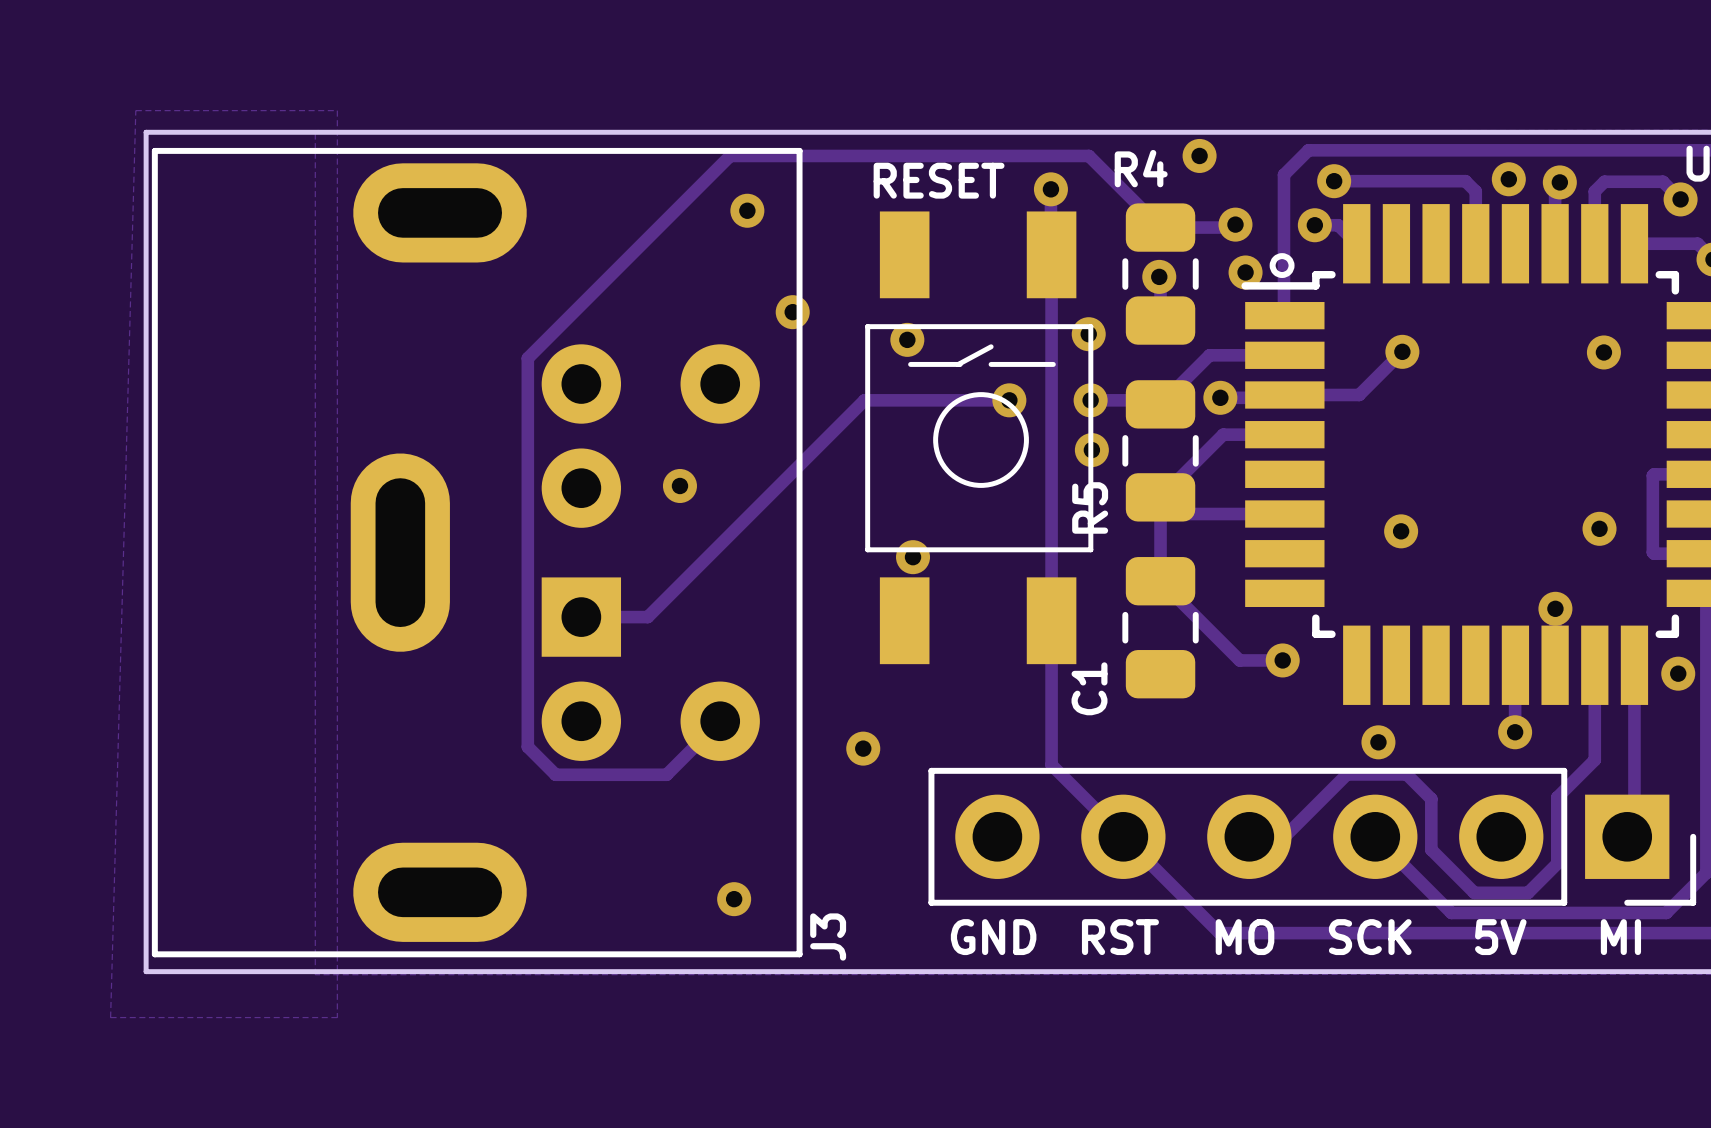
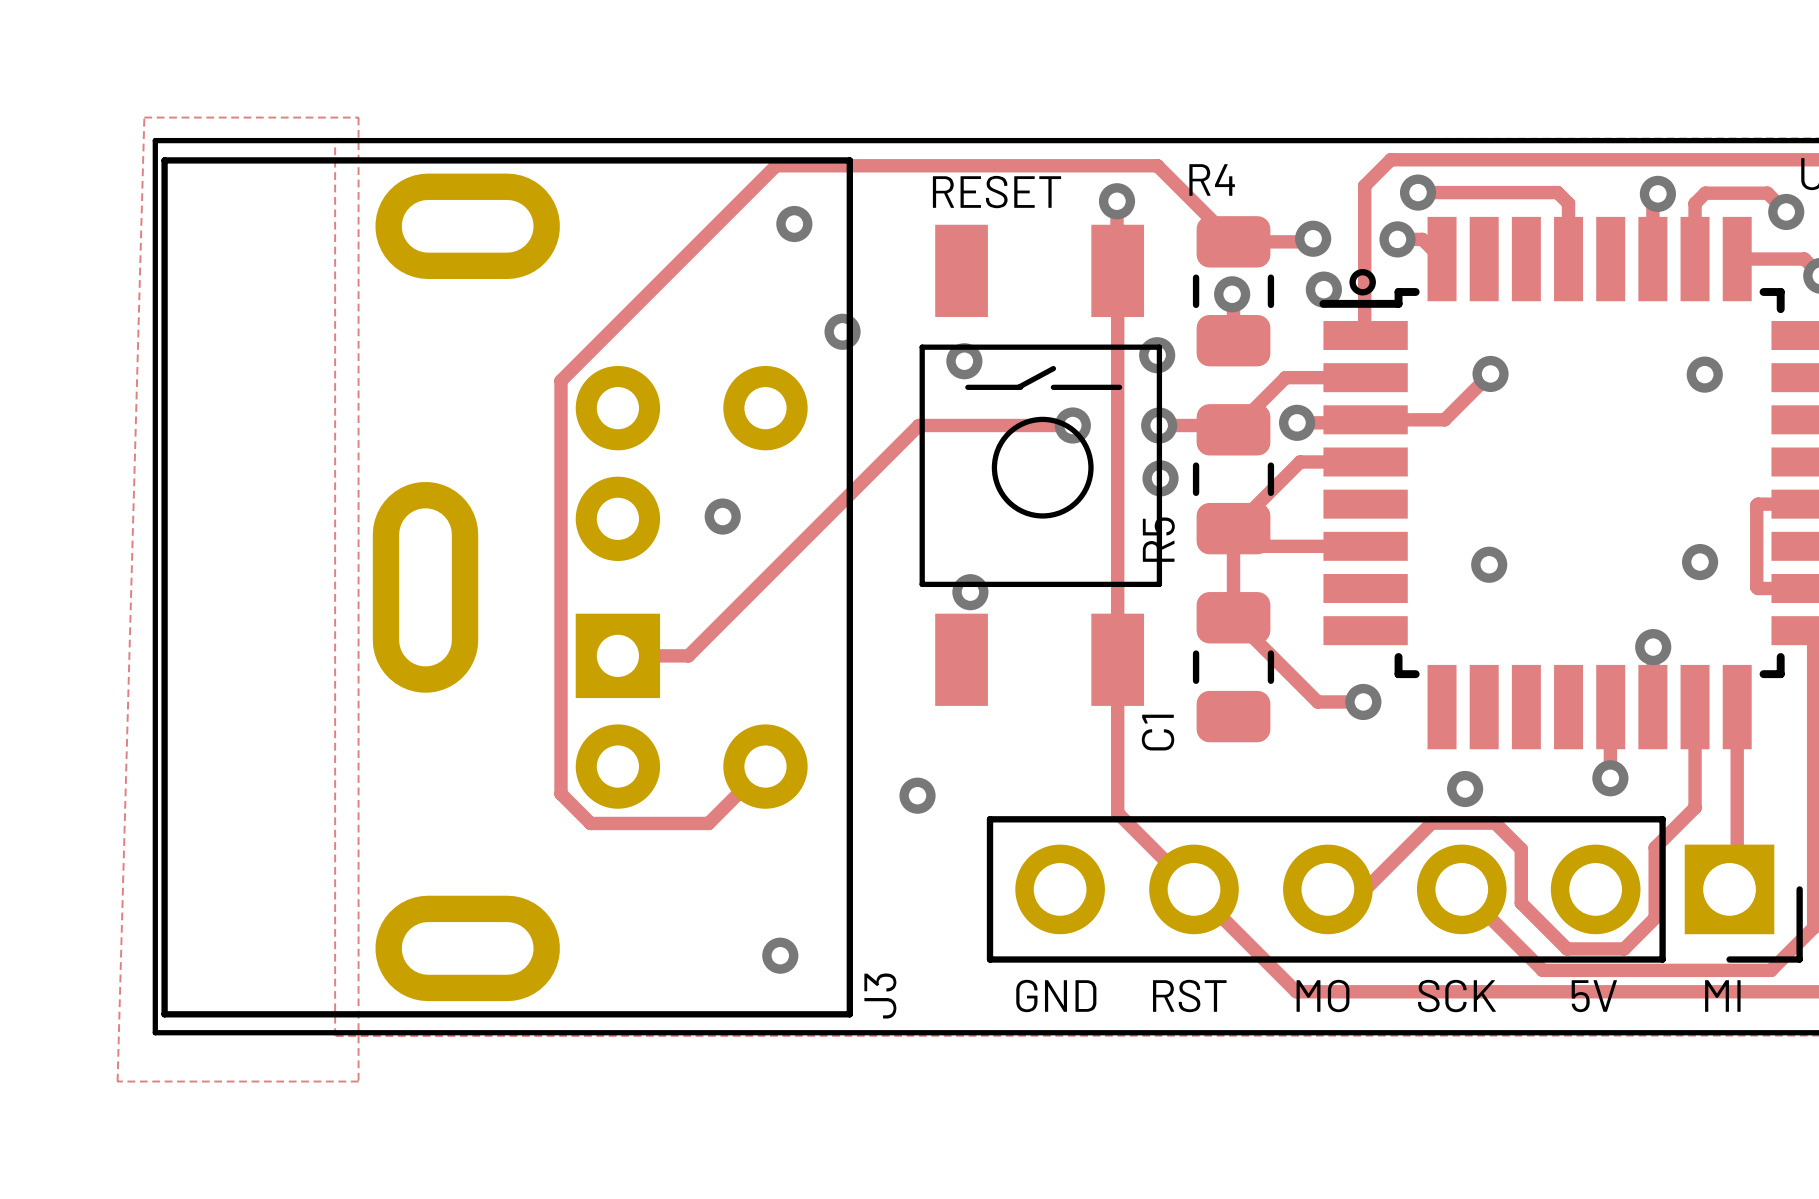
via: (1199, 155) -> none
via: (1508, 179) -> none
via: (1678, 673) -> none

